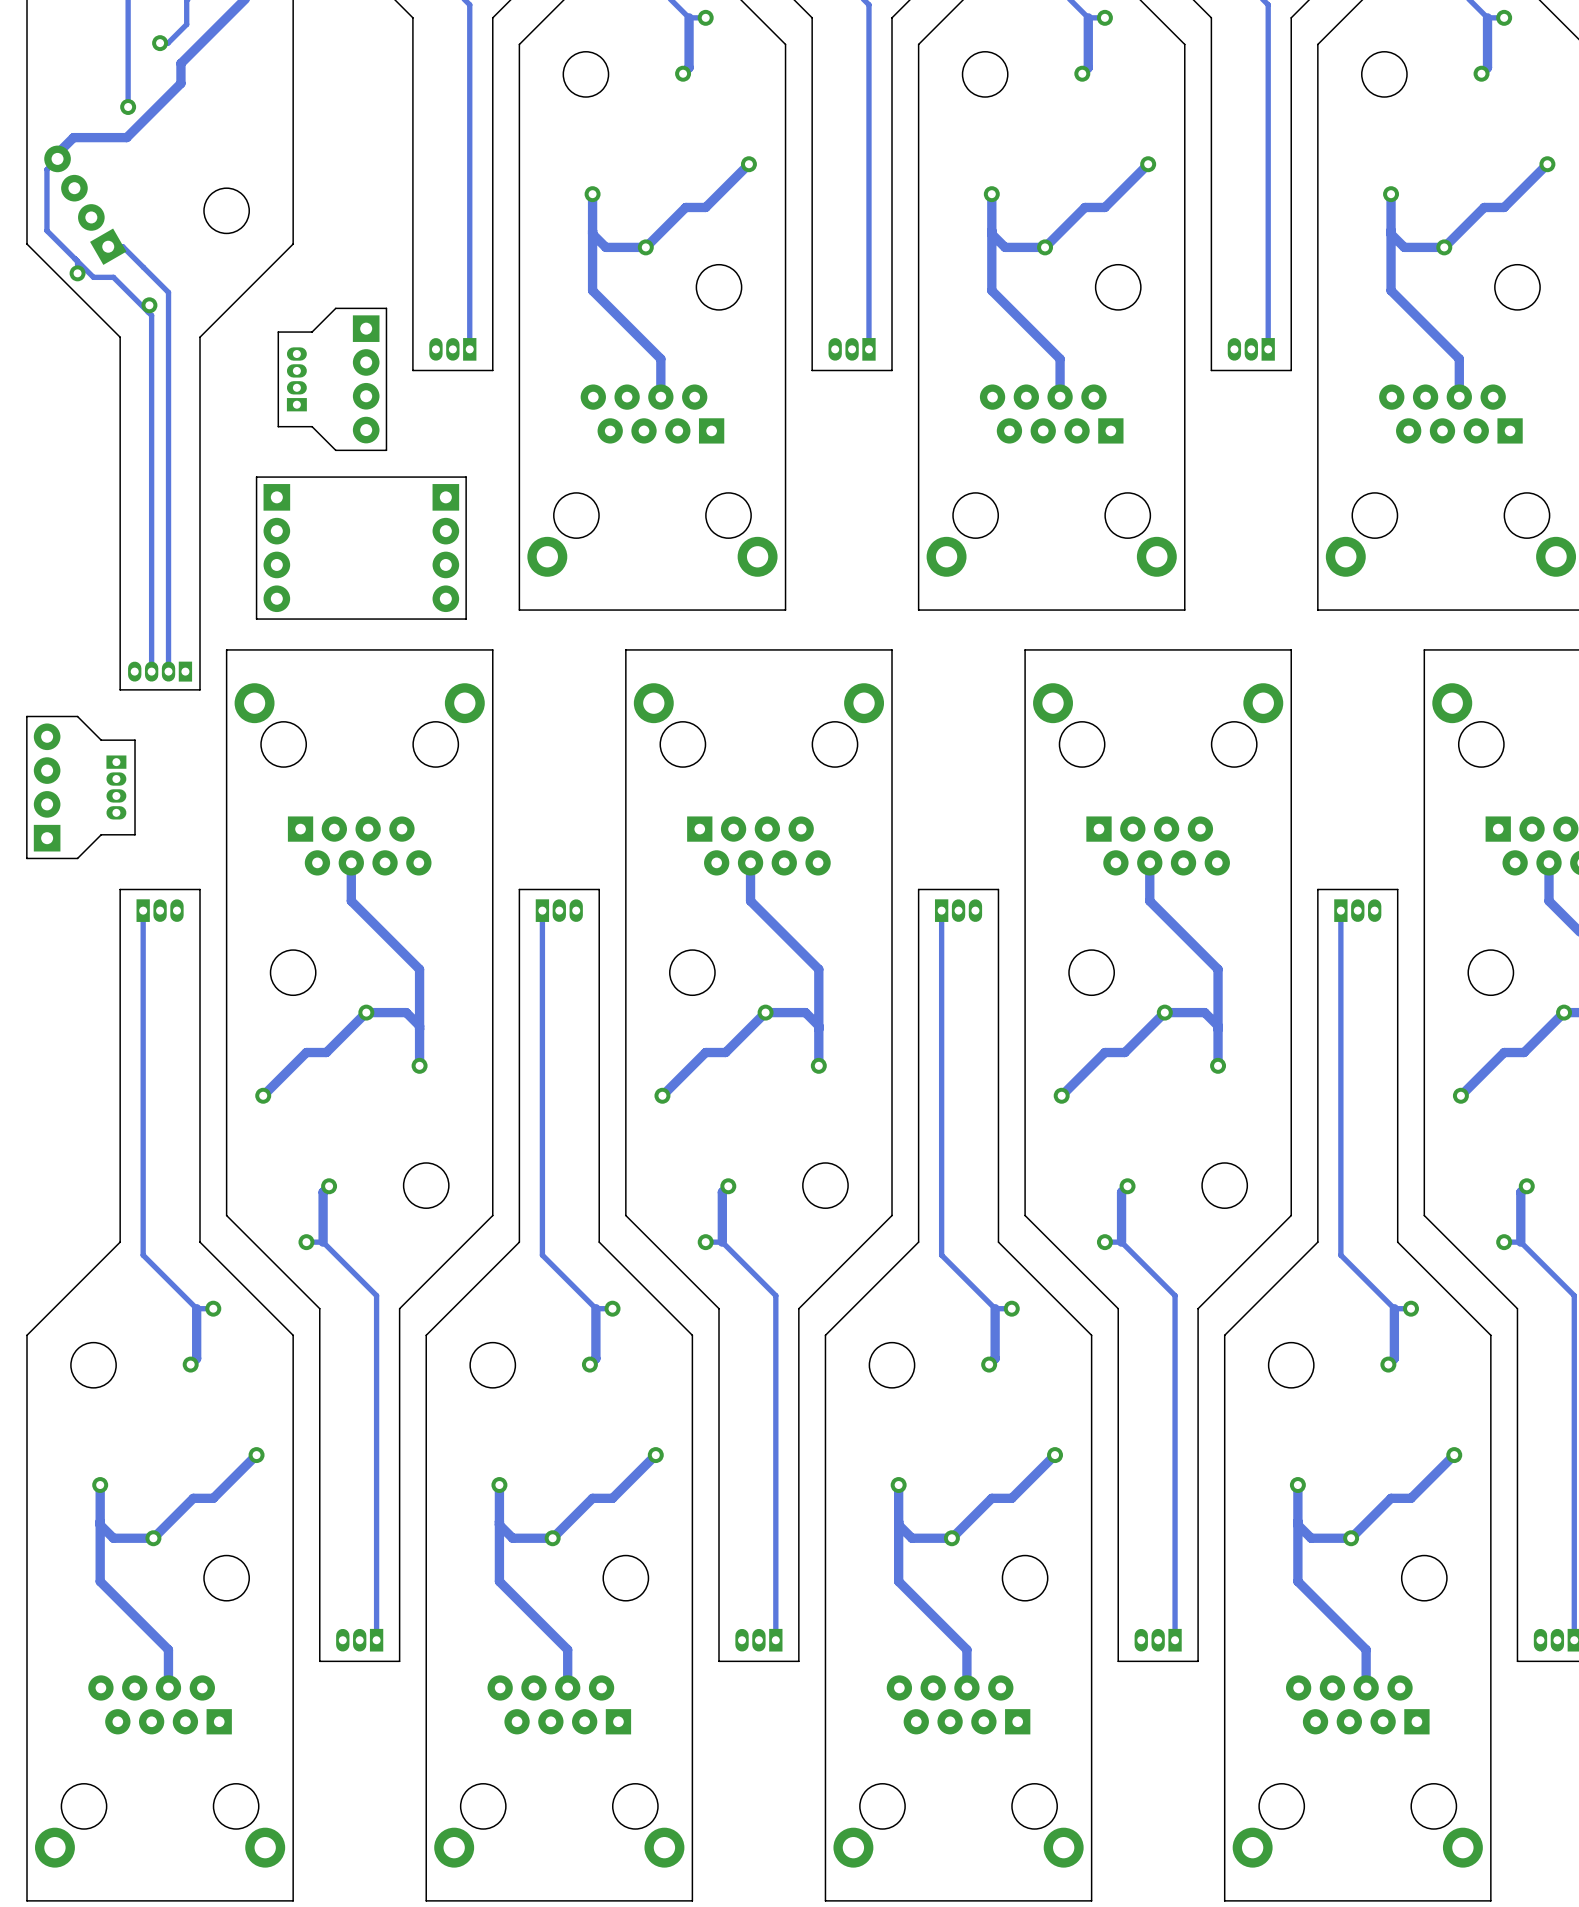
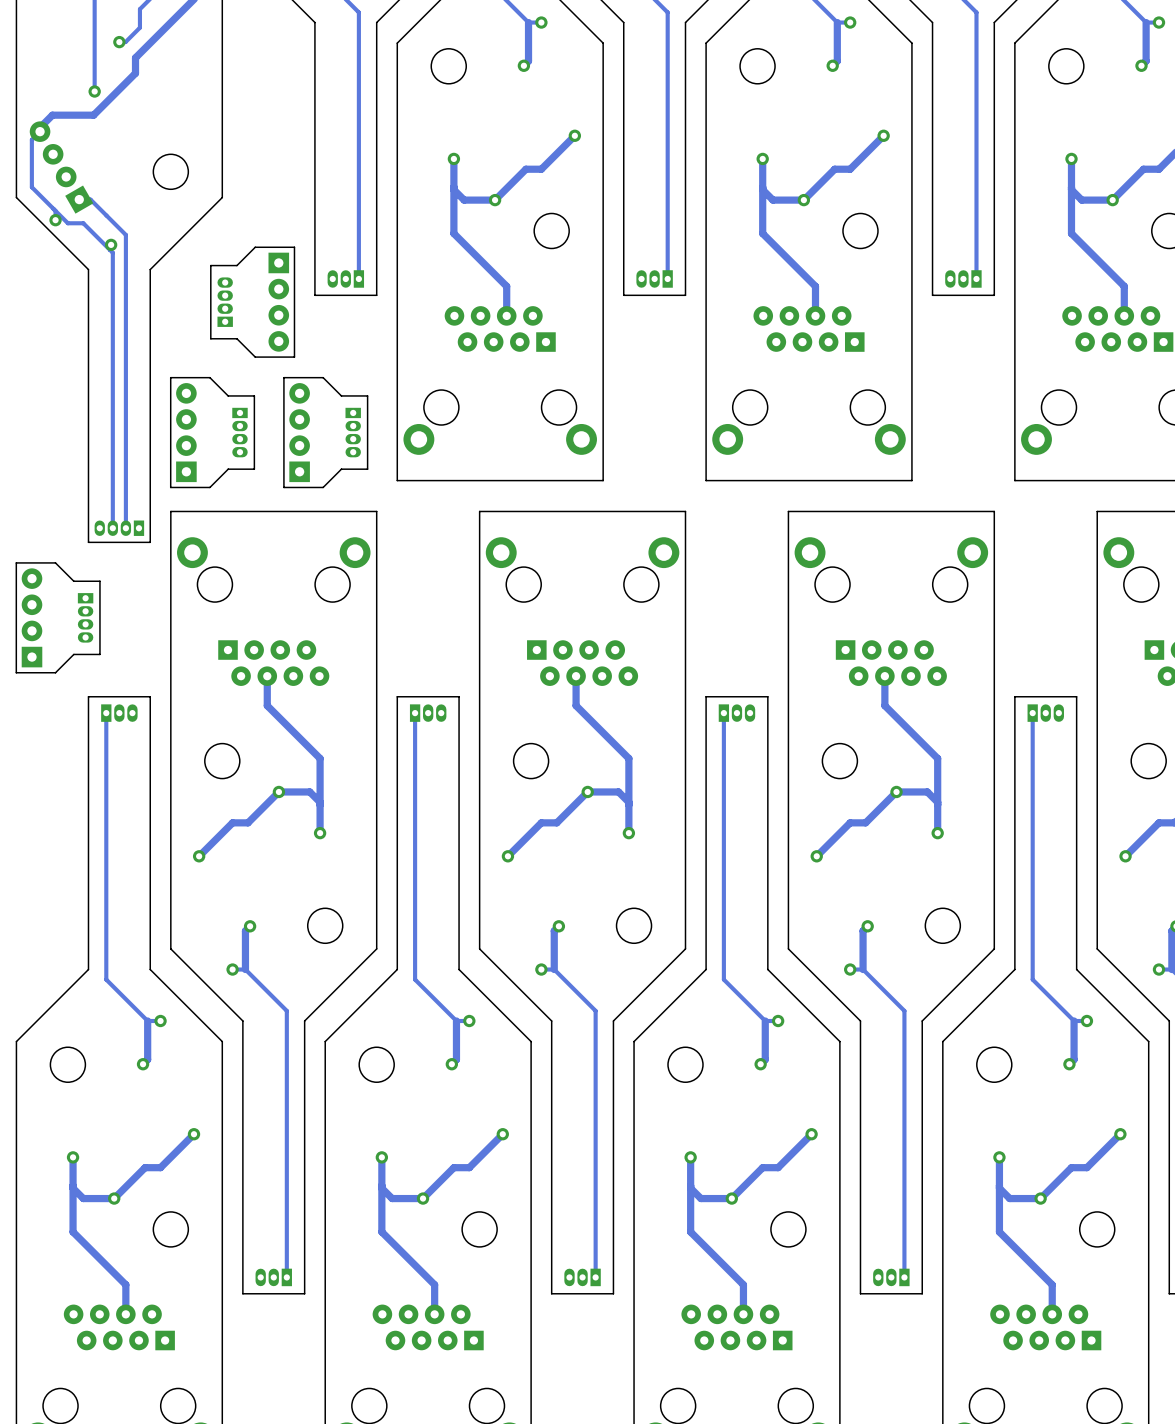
board edge: none -> (209, 377) (228, 395) (254, 395) (254, 469) (228, 469) (209, 487) (170, 487) (170, 377) (209, 377)
board edge: none -> (323, 377) (283, 377) (283, 487) (323, 487) (341, 469) (367, 469) (367, 395) (341, 395) (323, 377)
board edge: (466, 477) (466, 619) (256, 619) (256, 477) (466, 477) -> none
part: none -> (239, 432)
part: none -> (353, 432)
part rotation: 0° (276, 548) -> 180° (186, 432)
part rotation: 0° (445, 548) -> 180° (299, 432)

